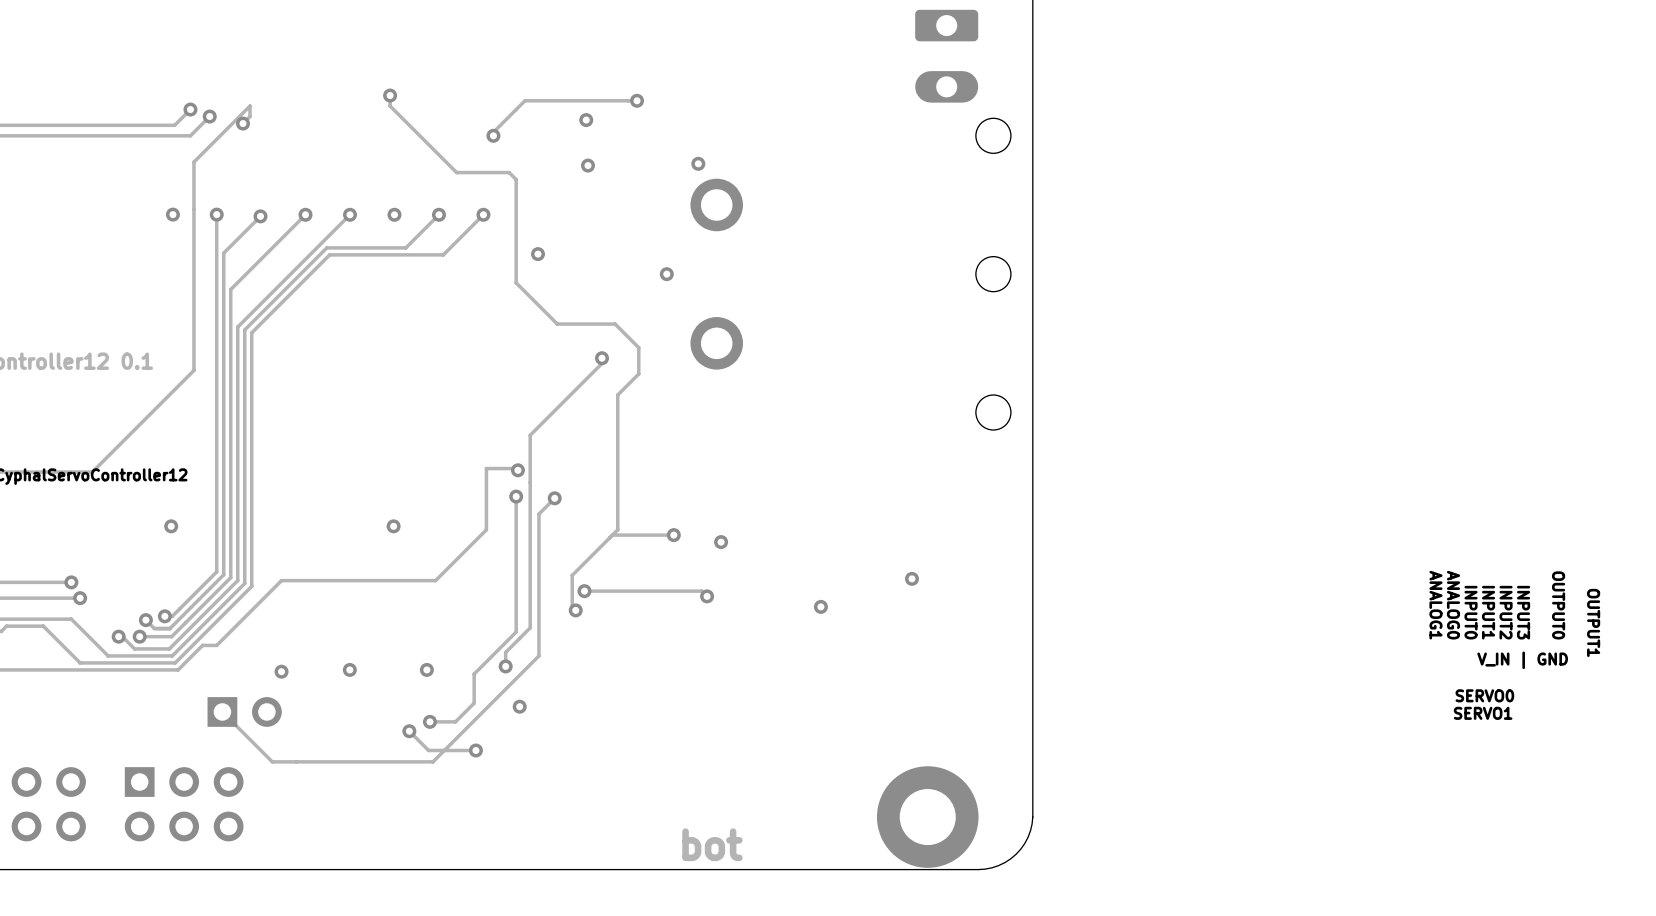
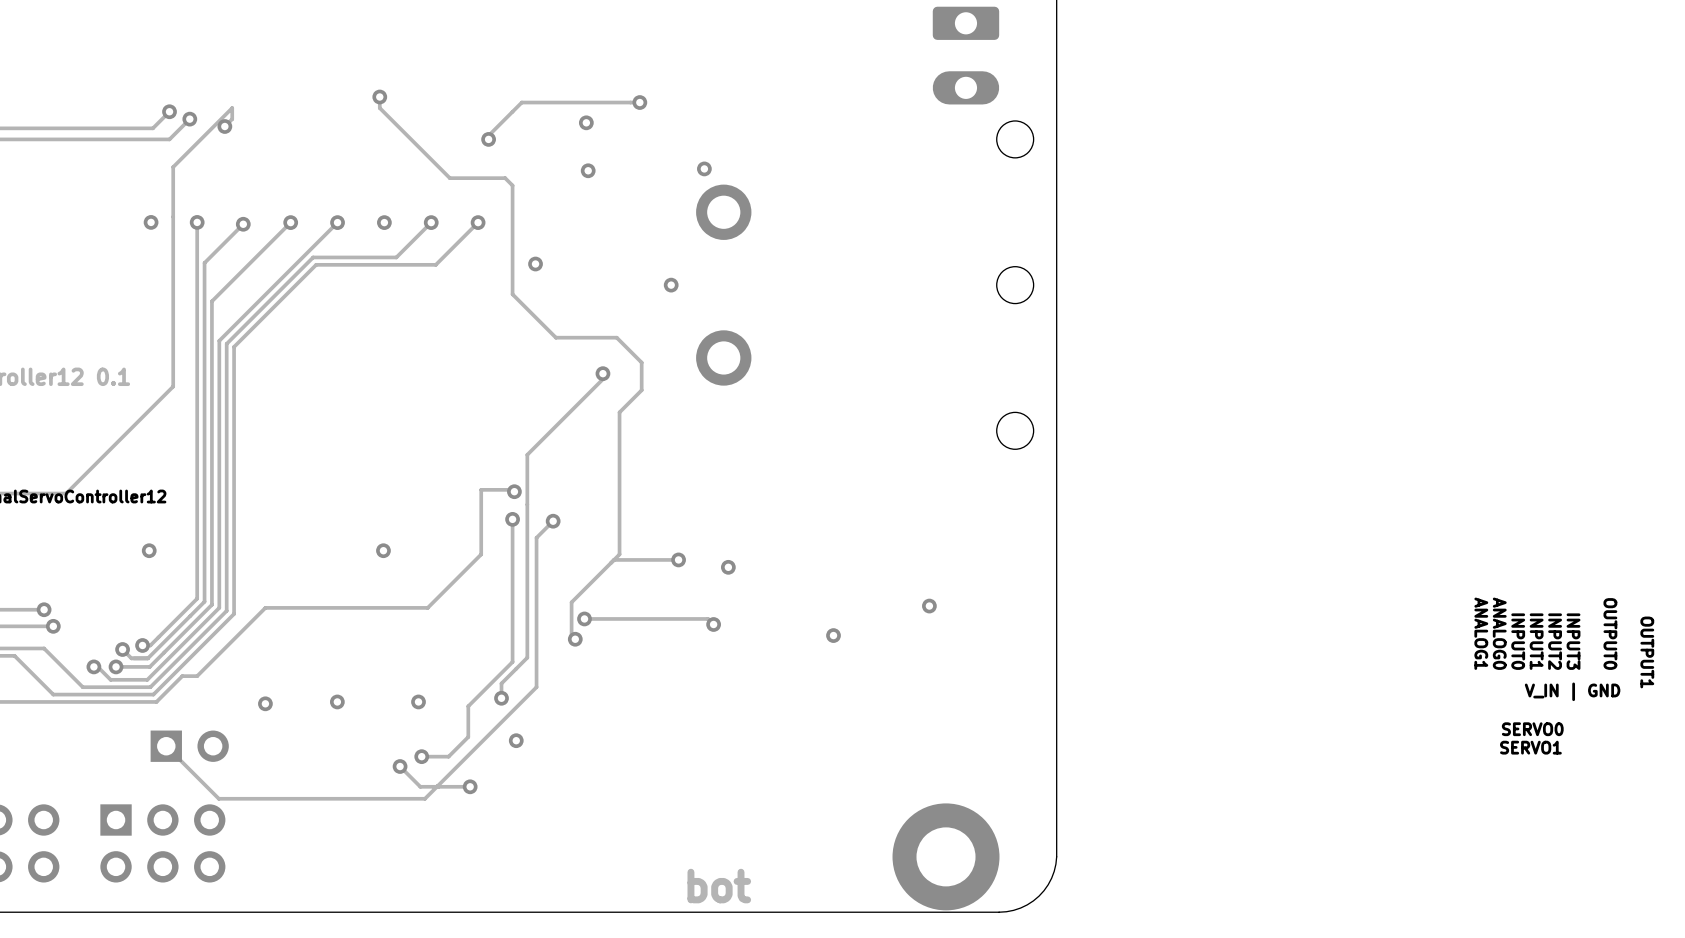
track: (222, 711) (272, 761) -> (166, 746) (218, 798) (255, 798)
part position: (244, 711) -> (189, 746)

